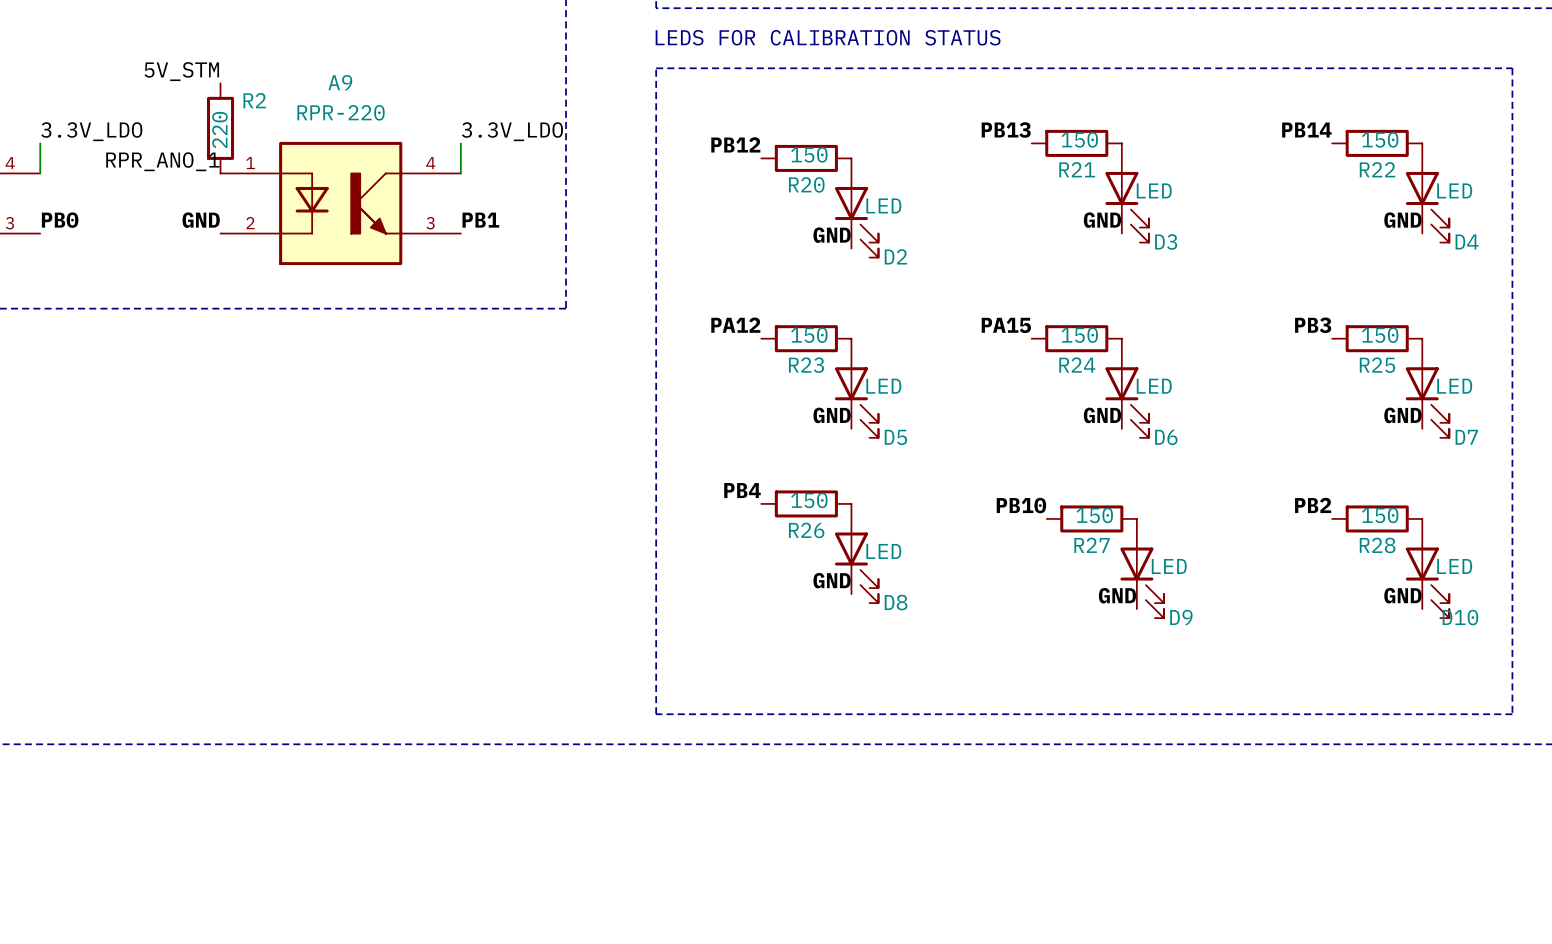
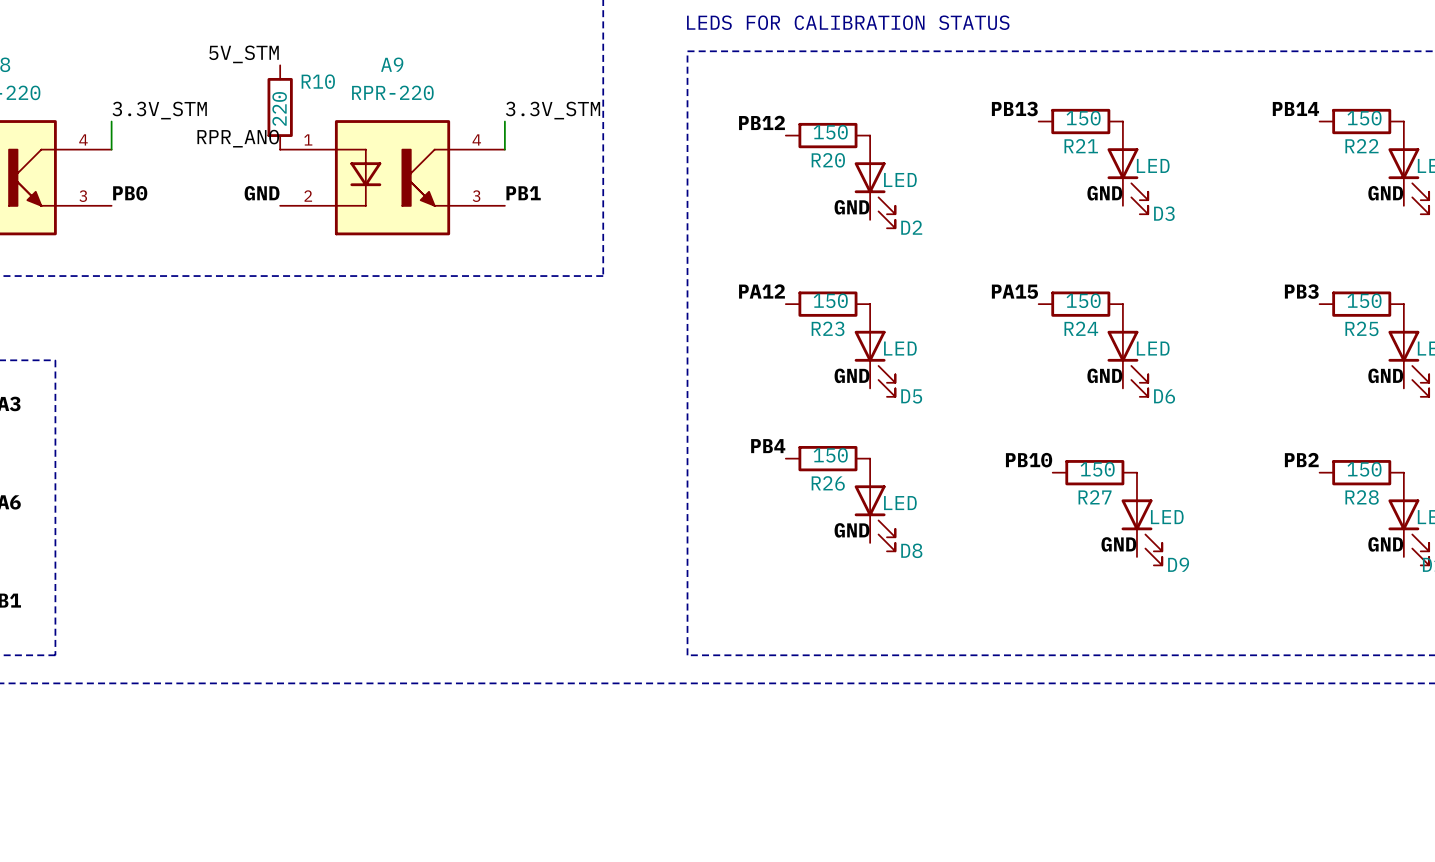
R2 name: R2 (254, 100) -> R10 (318, 81)
label: 3.3V_LDO (91, 131) -> 3.3V_STM (159, 110)
label: 3.3V_LDO (512, 131) -> 3.3V_STM (553, 110)
label: RPR_ANO_1 (162, 161) -> RPR_ANO (238, 138)

